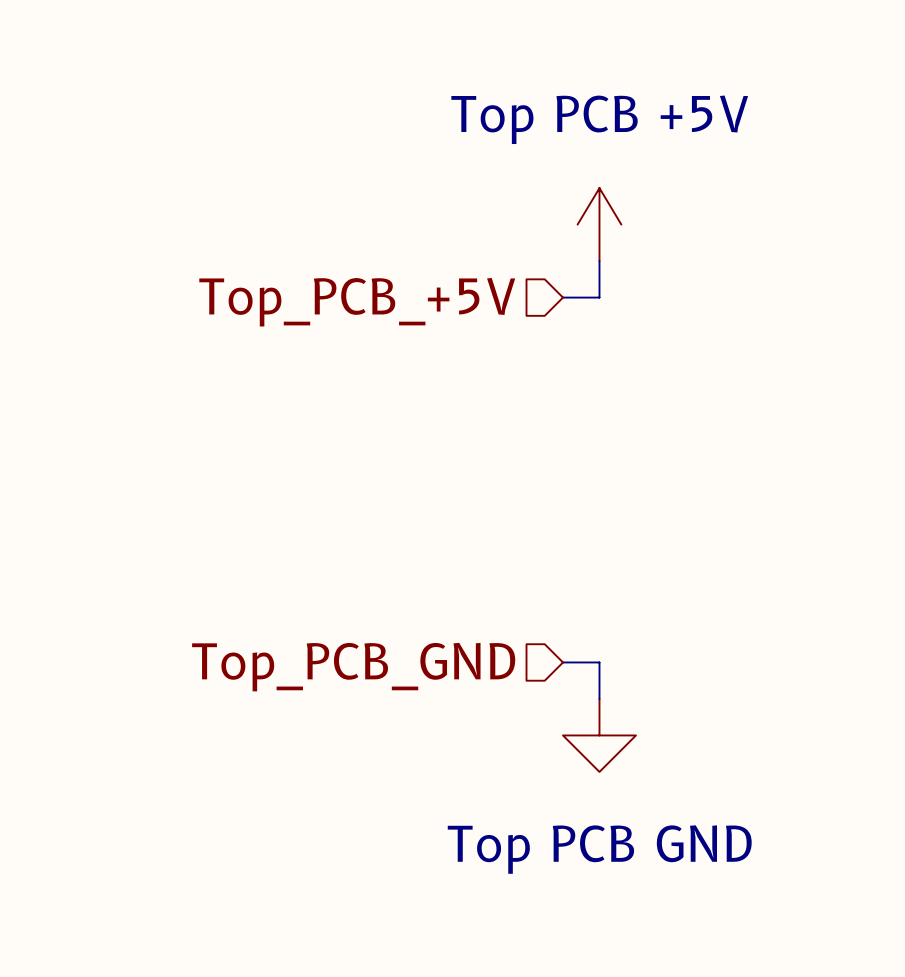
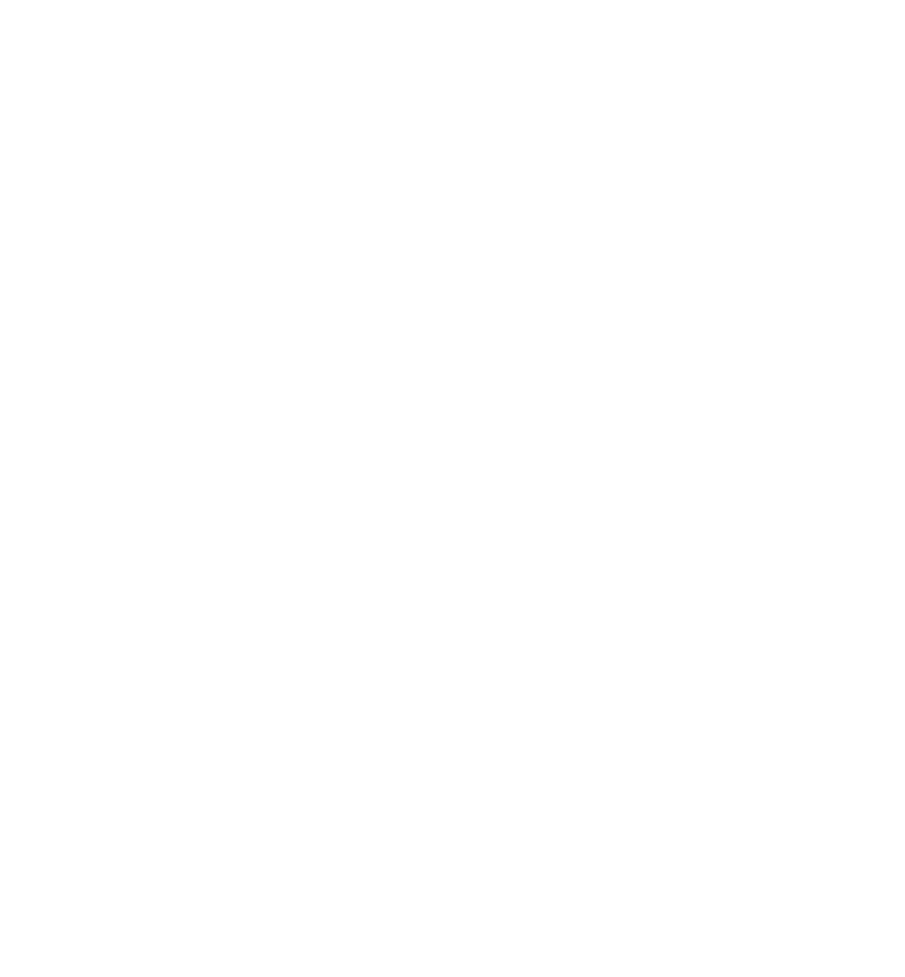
power symbol: Top PCB +5V (599, 224) -> none
wire: (599, 261) (599, 297) (562, 297) -> none
hierarchical label: Top_PCB_+5V (357, 302) -> none
wire: (562, 662) (599, 662) (599, 698) -> none
hierarchical label: Top_PCB_GND (353, 667) -> none
power symbol: Top PCB GND (599, 735) -> none

